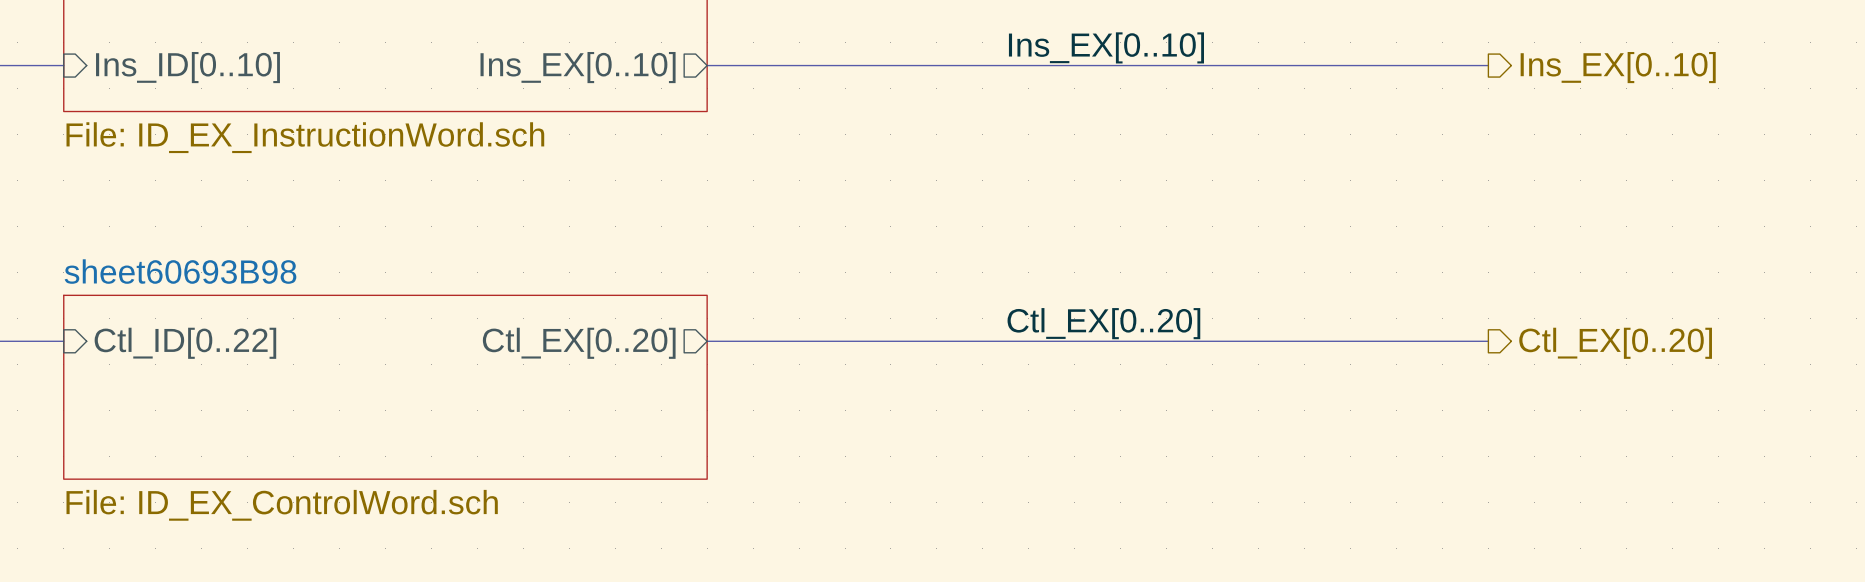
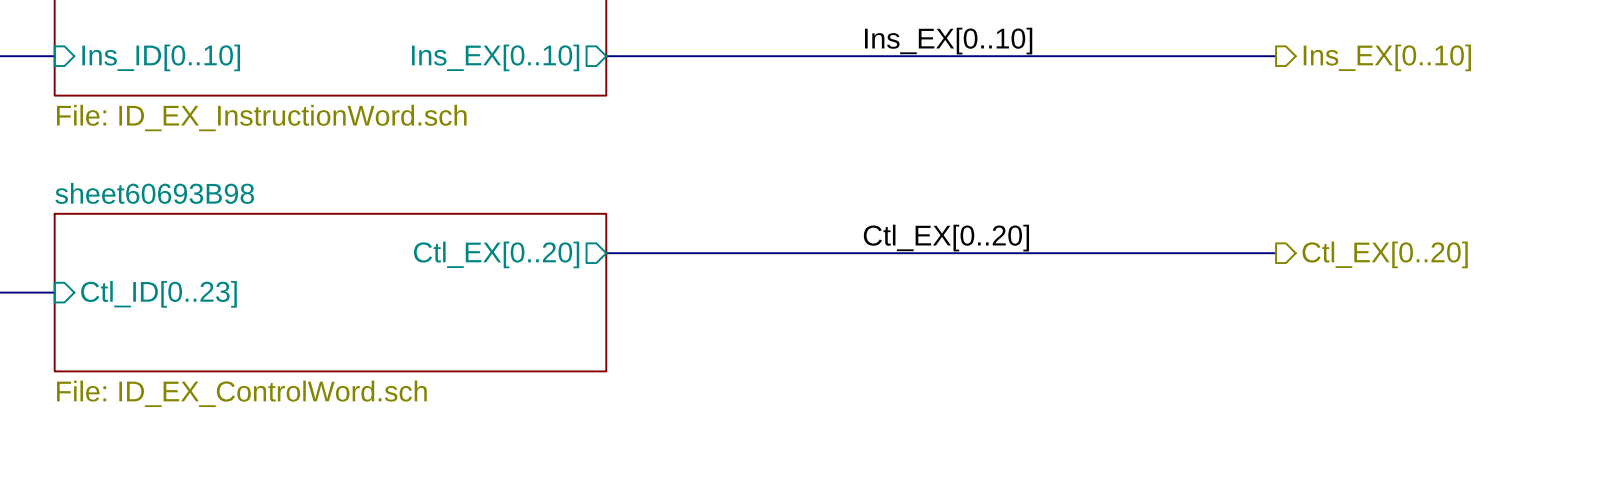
label position: Ctl_EX[0..20] (1103, 323) -> Ctl_EX[0..20] (946, 238)
bus: (707, 341) (1488, 341) -> (606, 253) (1276, 253)
sheet pin: Ctl_ID[0..22] (185, 343) -> Ctl_ID[0..23] (158, 294)
sheet pin position: Ctl_EX[0..20] (579, 343) -> Ctl_EX[0..20] (496, 254)
hierarchical label position: Ctl_EX[0..20] (1615, 343) -> Ctl_EX[0..20] (1385, 254)
sheet sheet60693B98 position: (385, 387) -> (330, 292)

